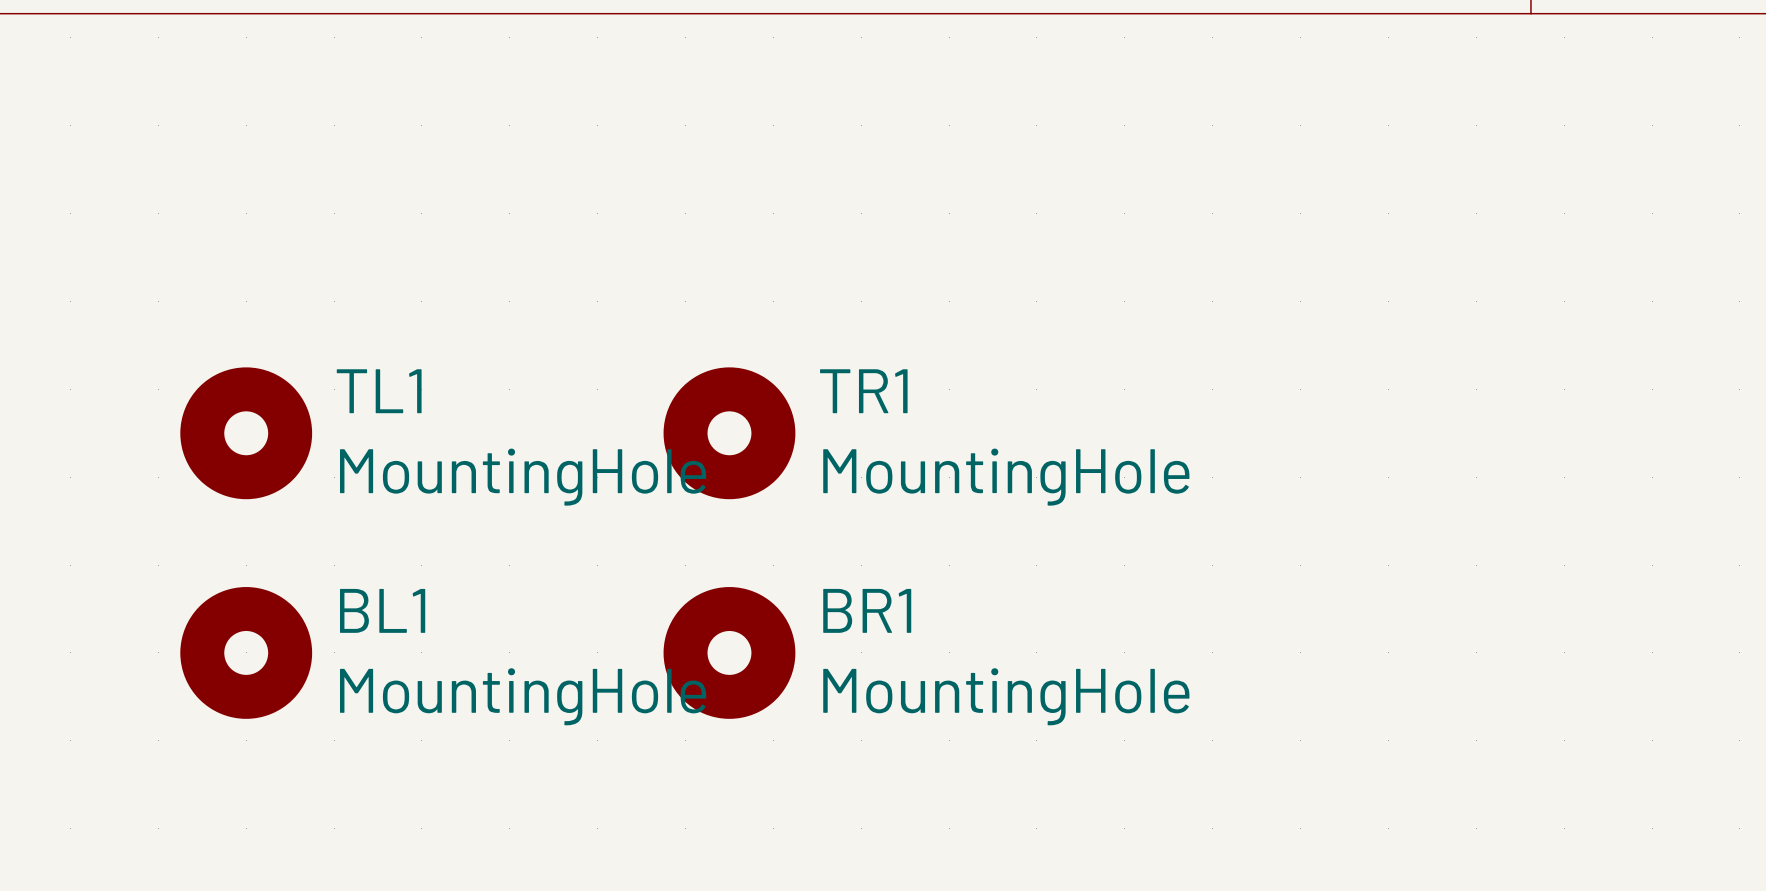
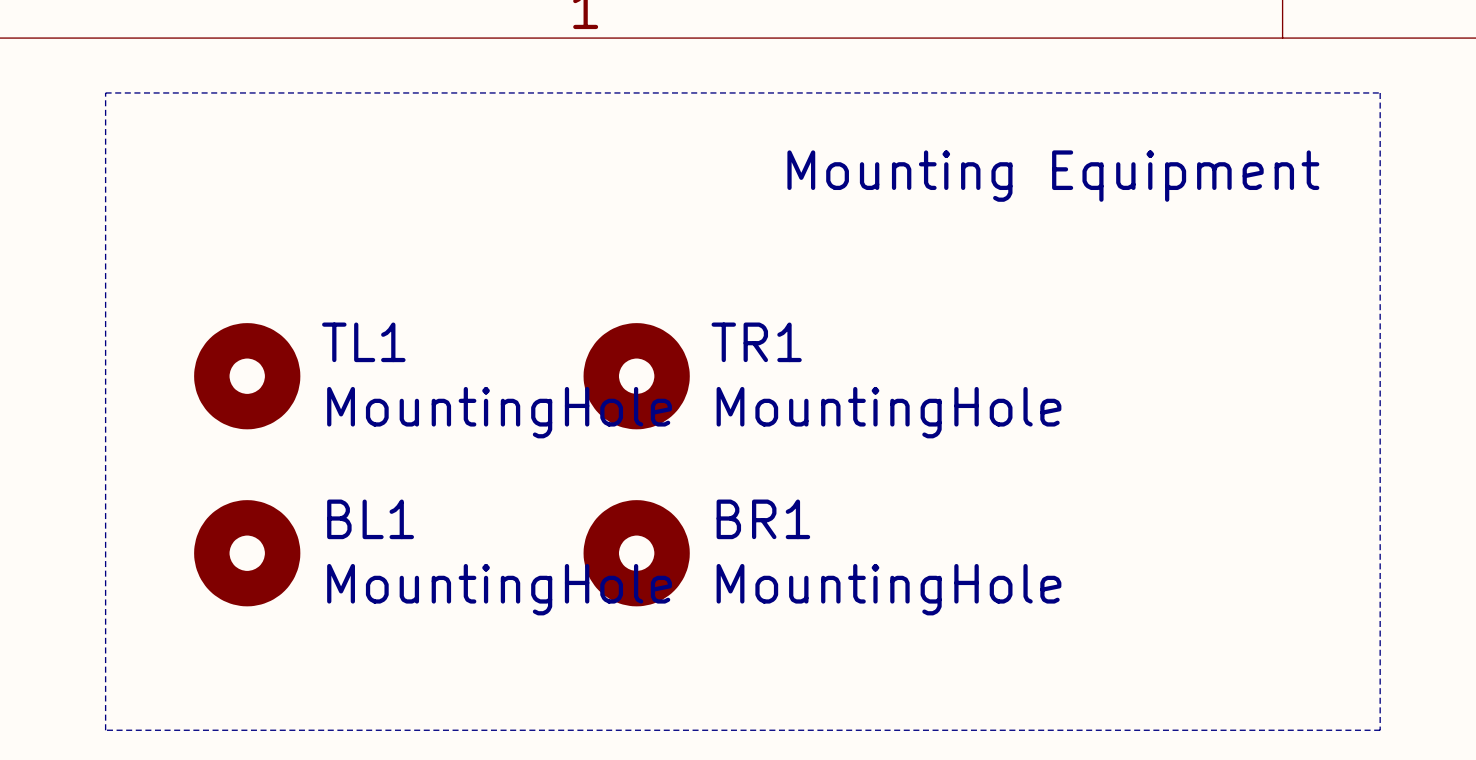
line: none -> (105, 92) (105, 730) (1380, 730) (1380, 92) (105, 92)
text: none -> Mounting Equipment (1053, 176)

